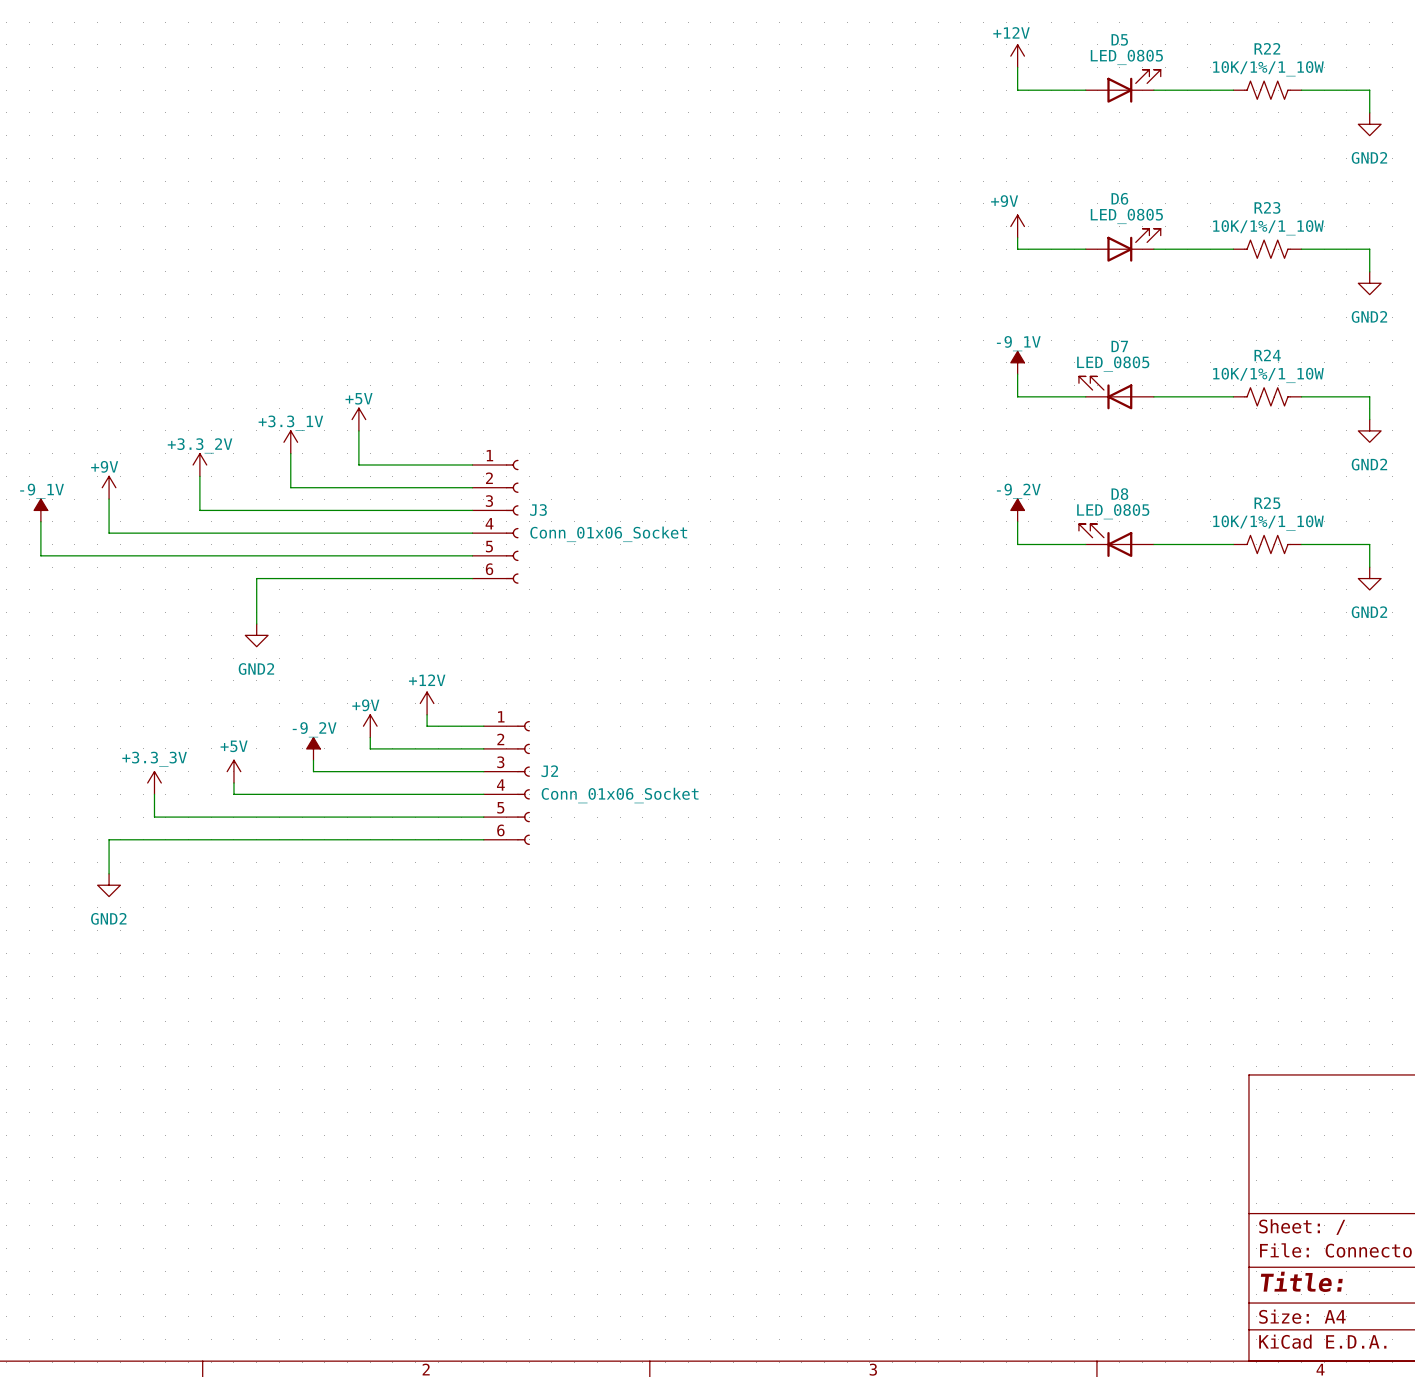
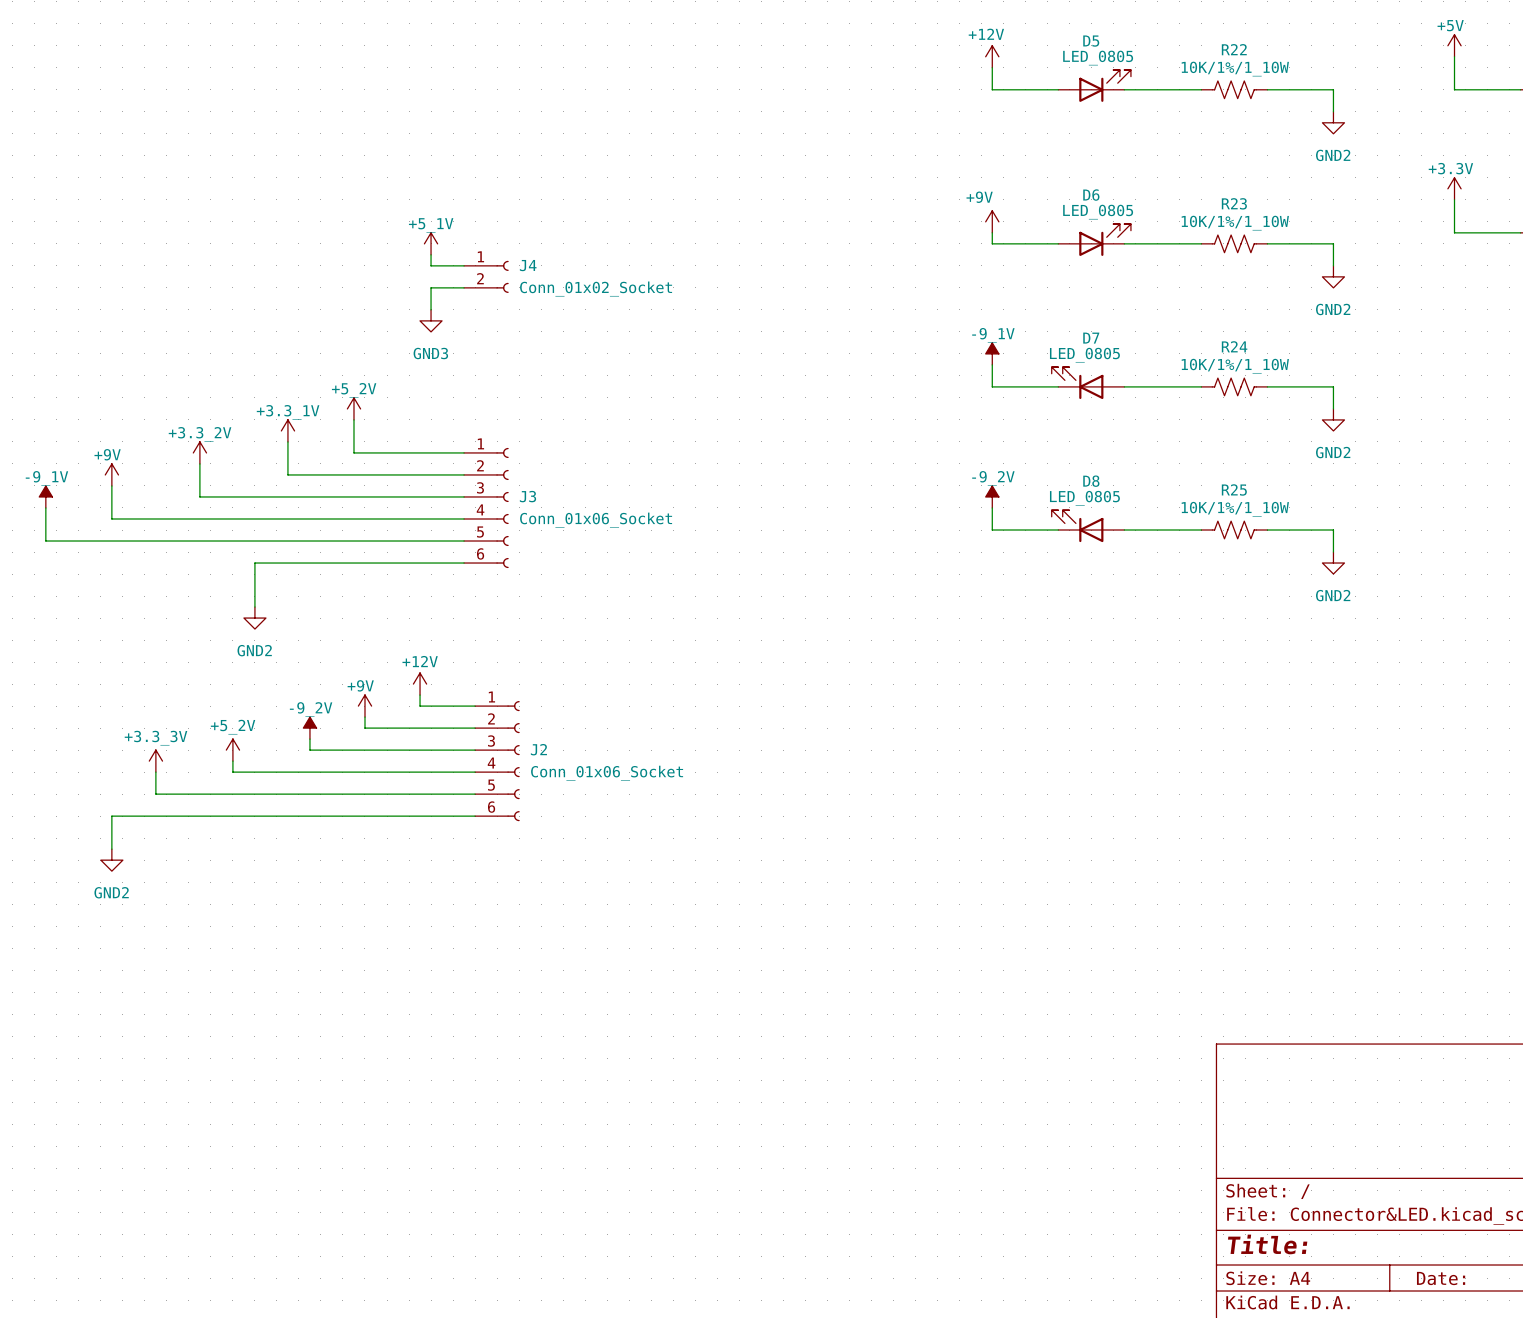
power symbol: none -> +5_1V (431, 243)
wire: none -> (431, 254) (431, 265) (464, 265)
J4: none -> Conn_01x02_Socket (486, 276)
wire: none -> (464, 287) (431, 287) (431, 309)
power symbol: none -> GND3 (431, 320)
power symbol: +5V (358, 419) -> +5_2V (353, 408)
power symbol: +5V (233, 771) -> +5_2V (232, 750)

